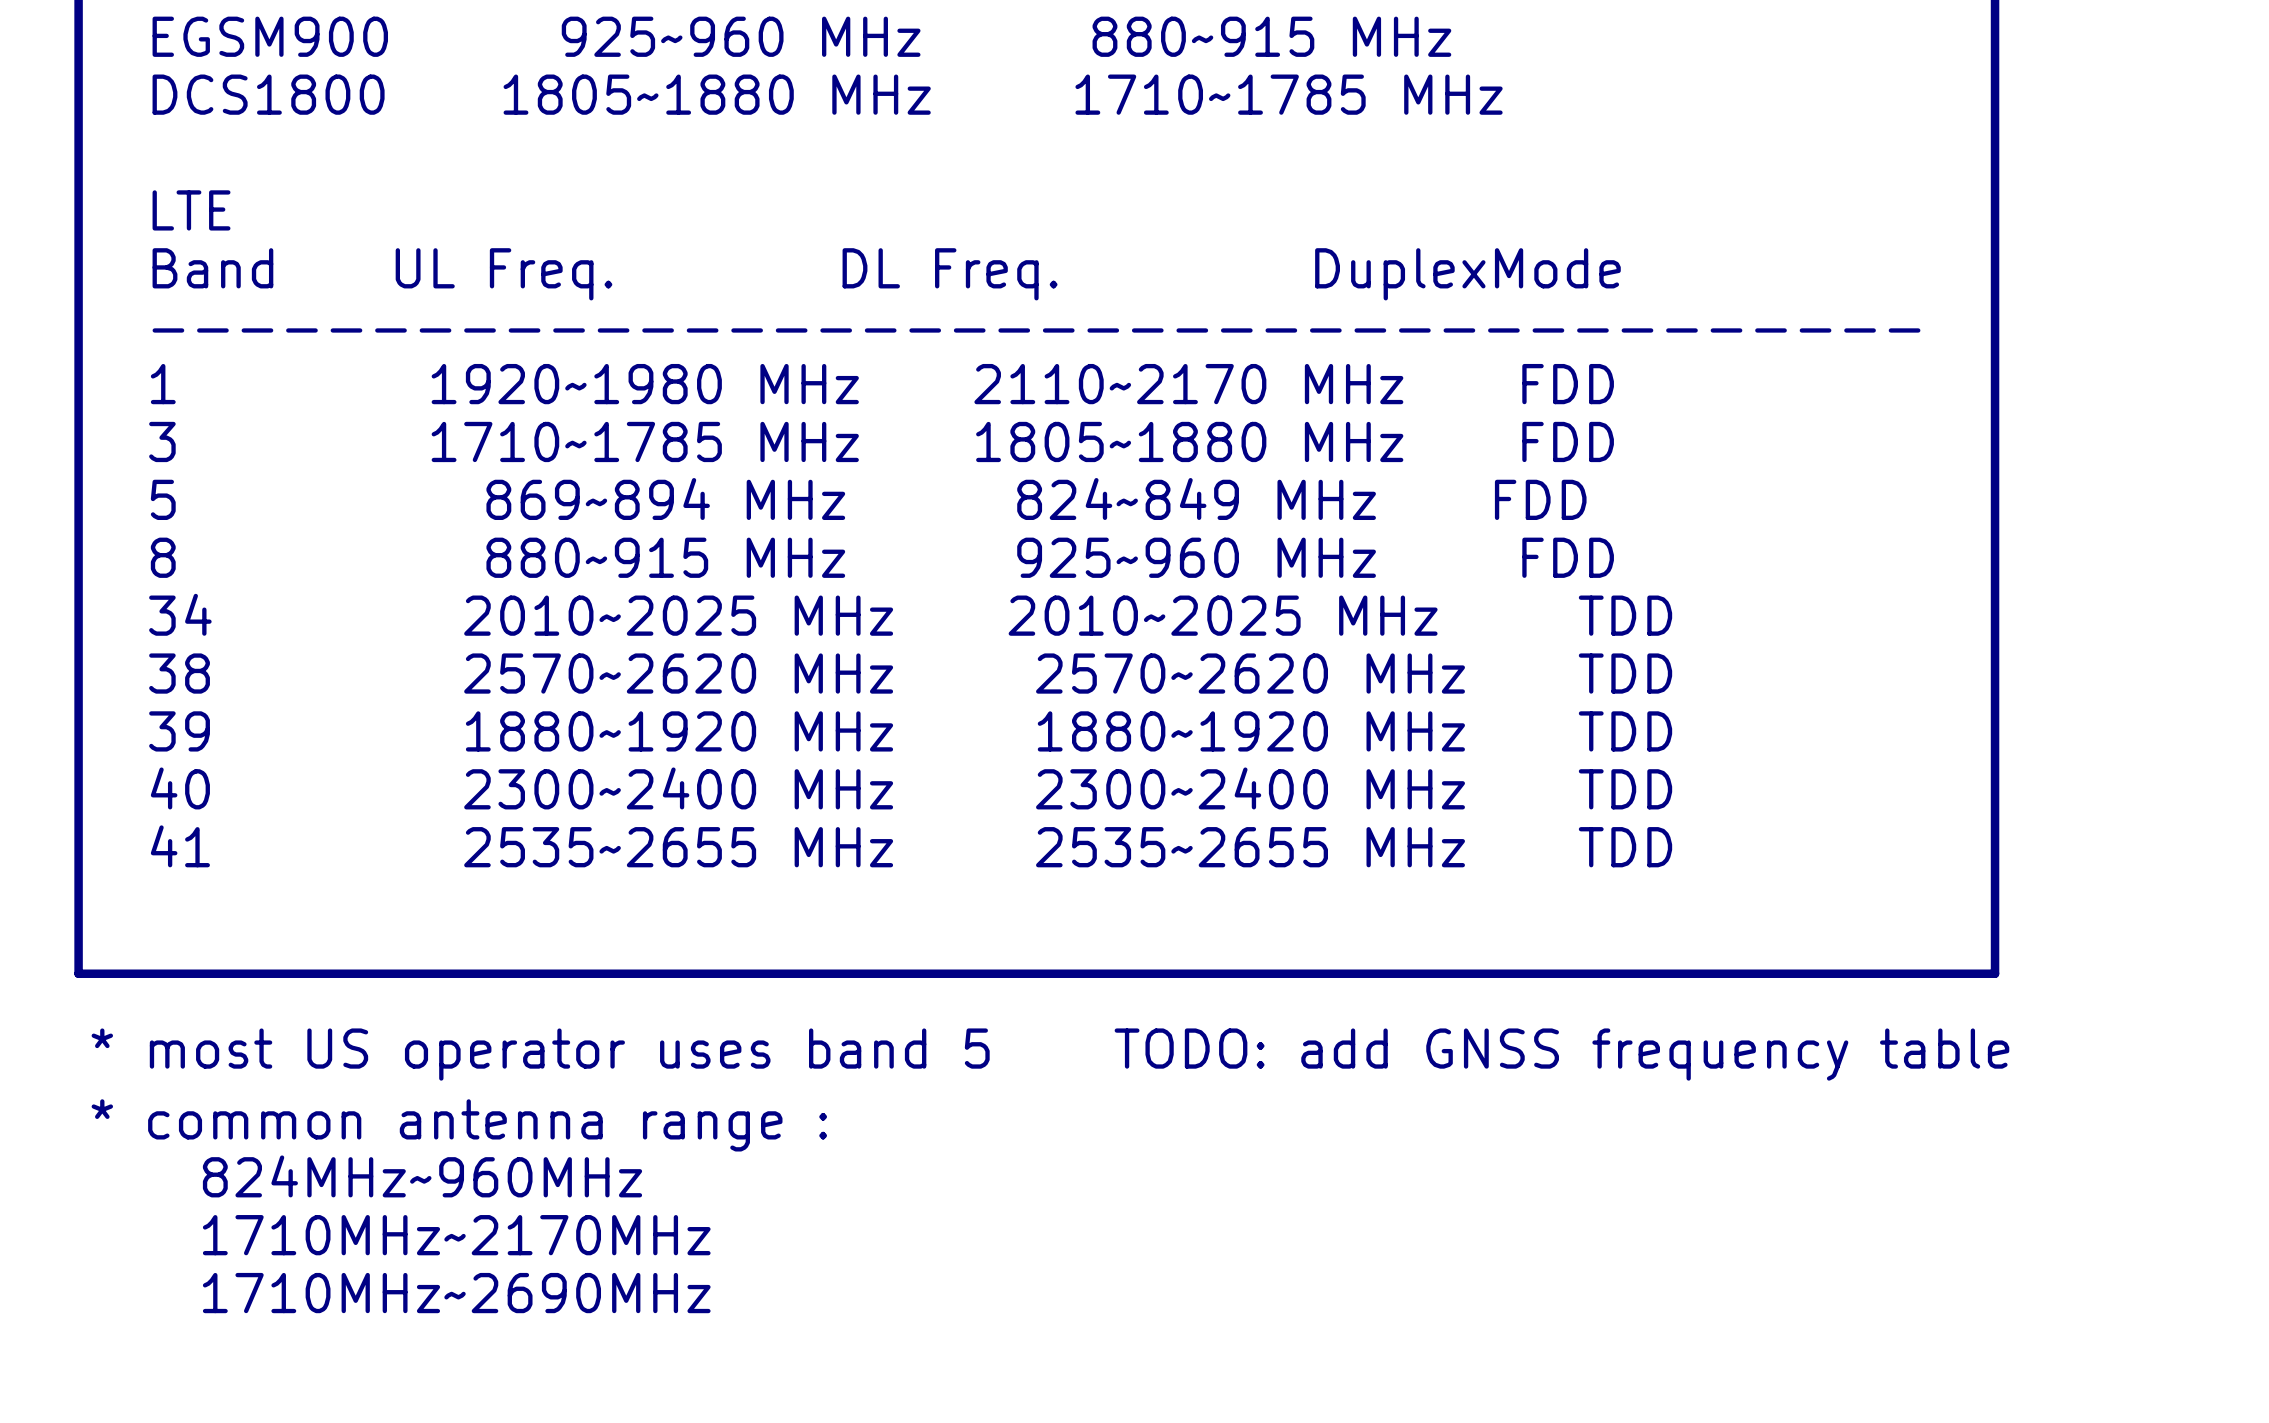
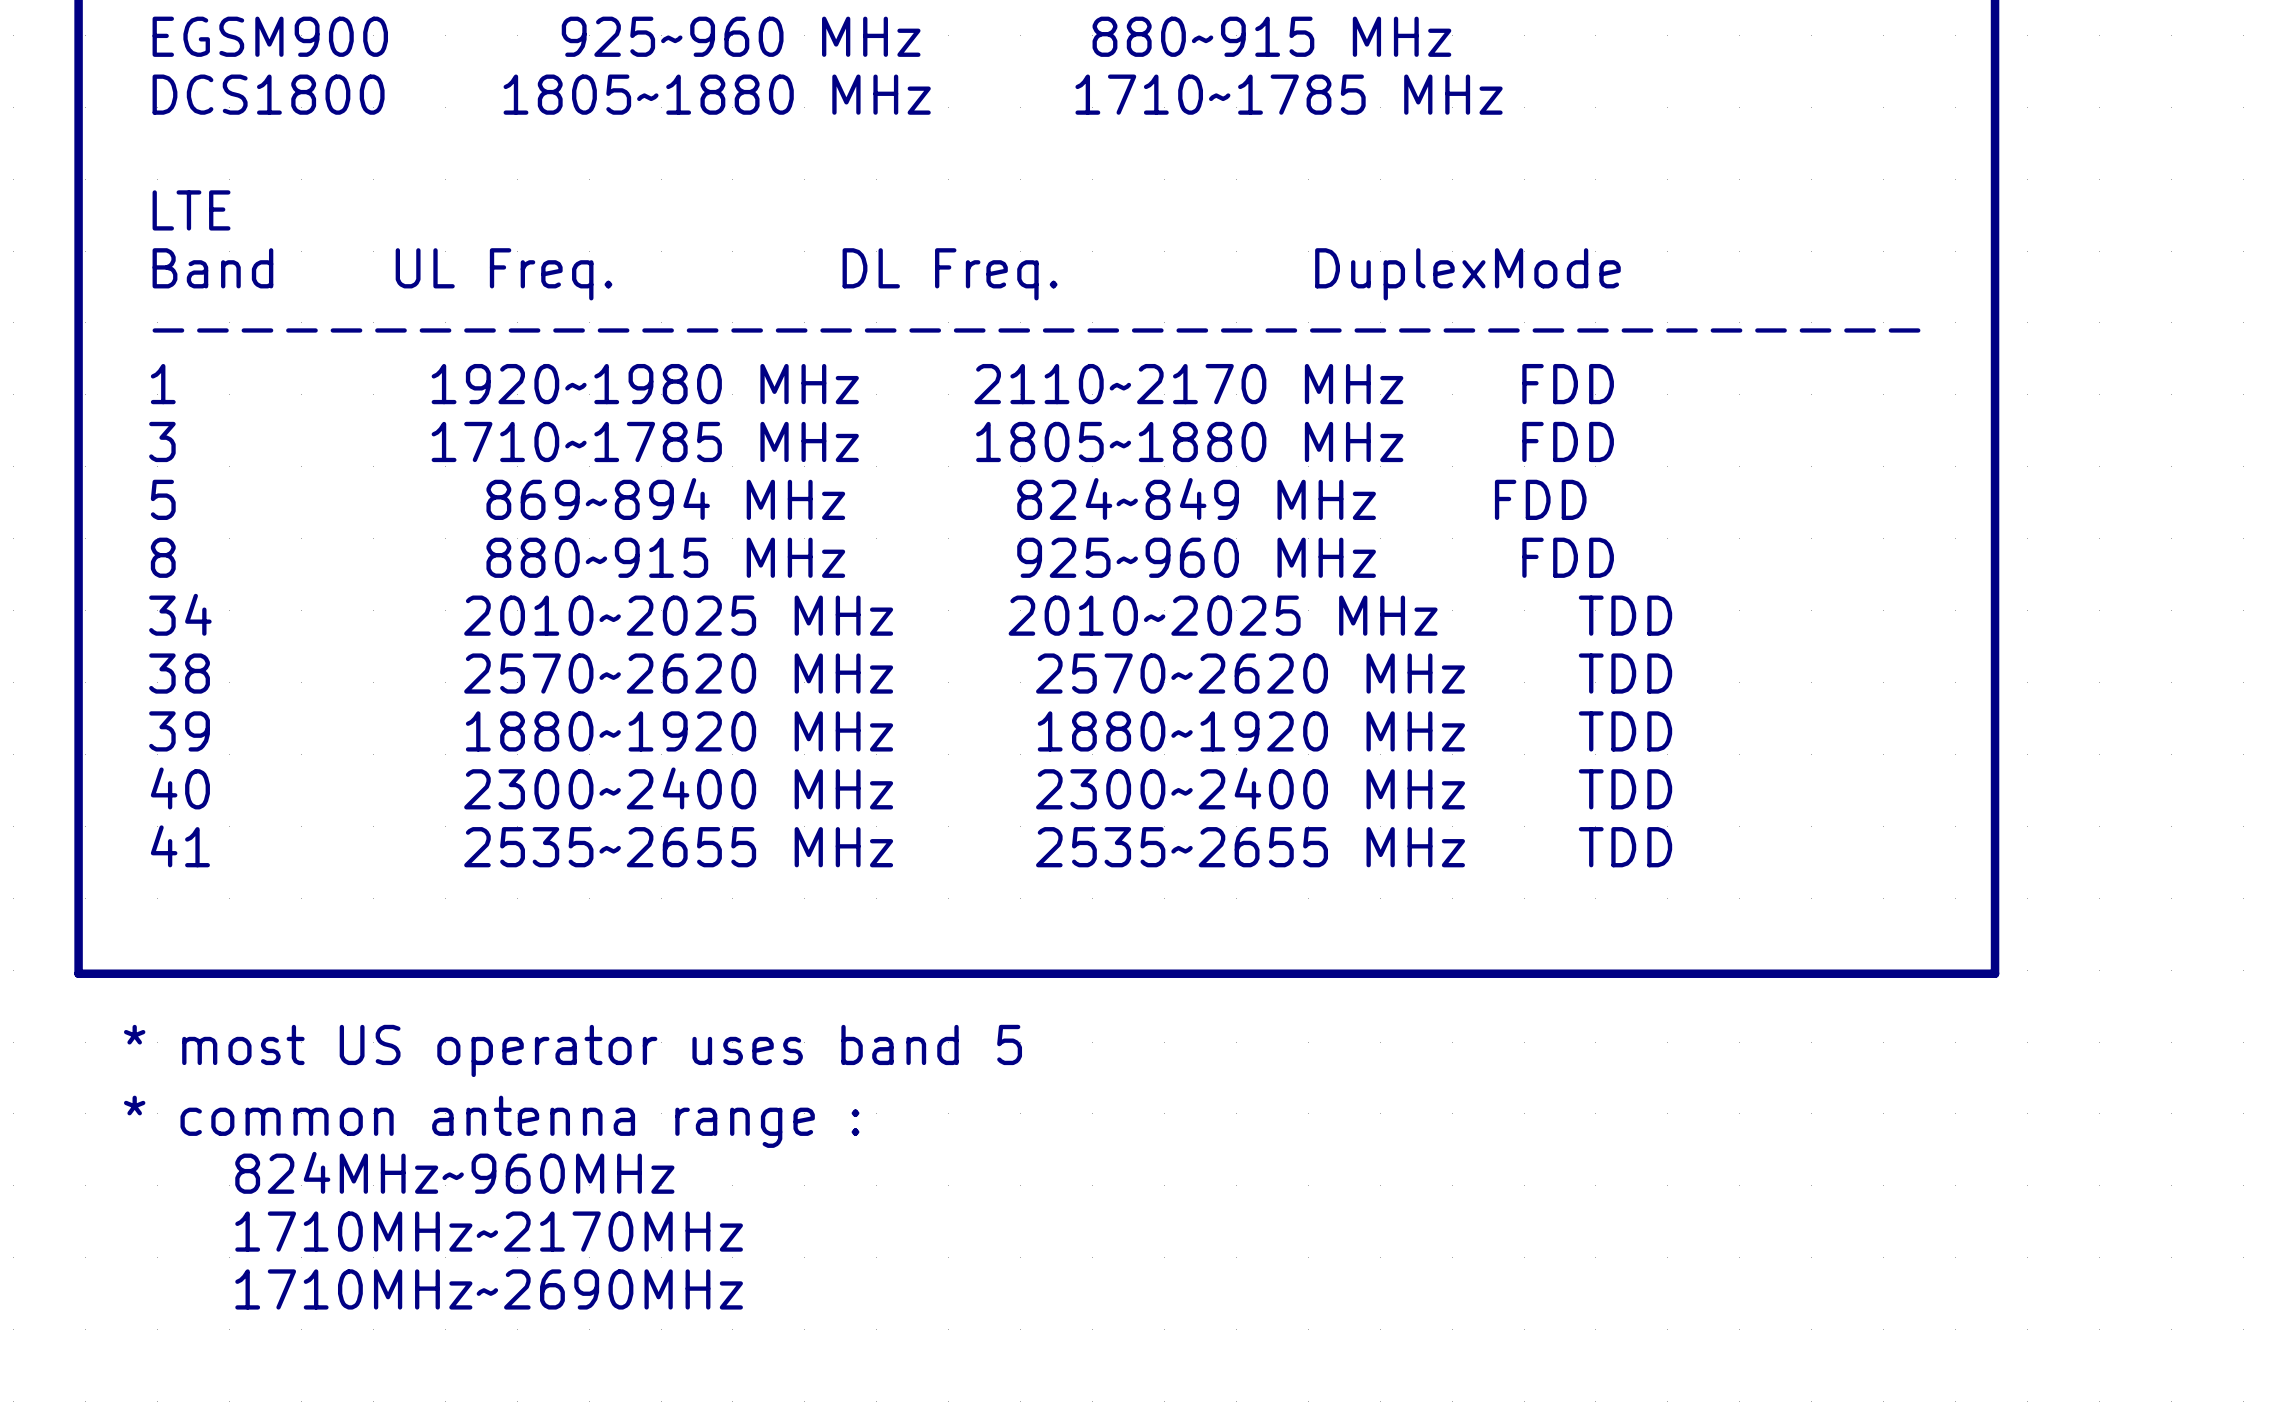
text position: * most US operator uses band 5 (540, 1054) -> * most US operator uses band 5 (572, 1050)
text: TODO: add GNSS frequency table (1561, 1054) -> none
text position: * common antenna range : (459, 1125) -> * common antenna range : (491, 1121)
text position: 824MHz~960MHz (422, 1176) -> 824MHz~960MHz (454, 1172)
text position: 1710MHz~2170MHz (456, 1235) -> 1710MHz~2170MHz (489, 1231)
text position: 1710MHz~2690MHz (456, 1293) -> 1710MHz~2690MHz (489, 1289)

